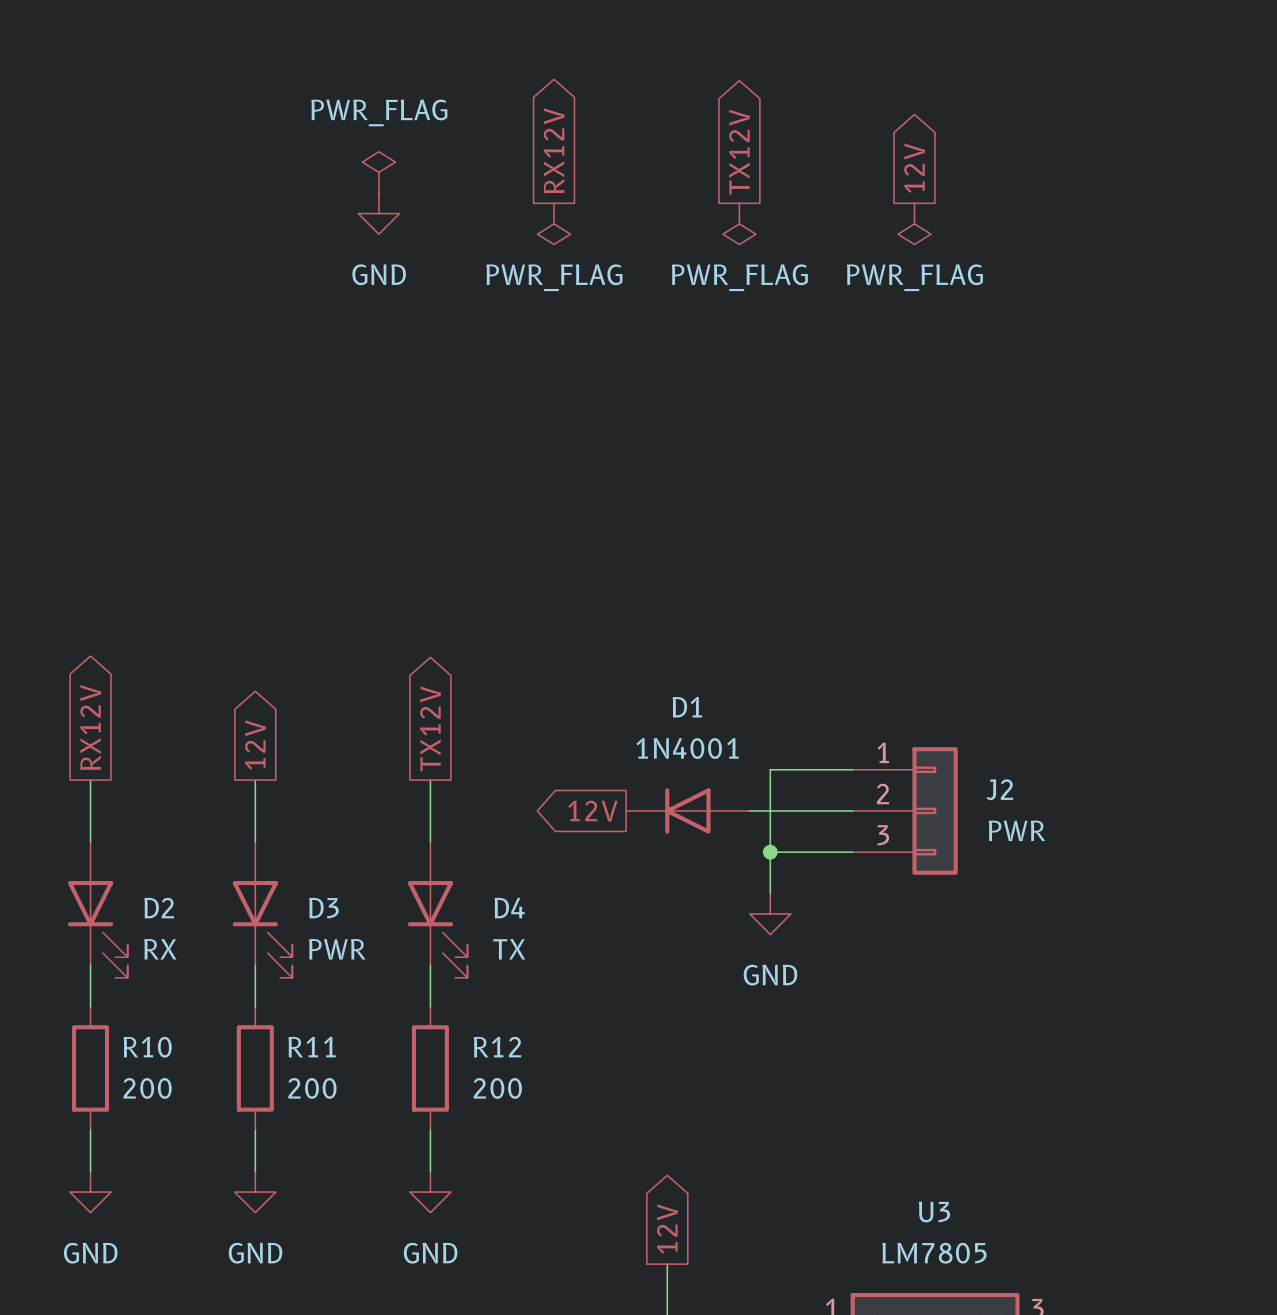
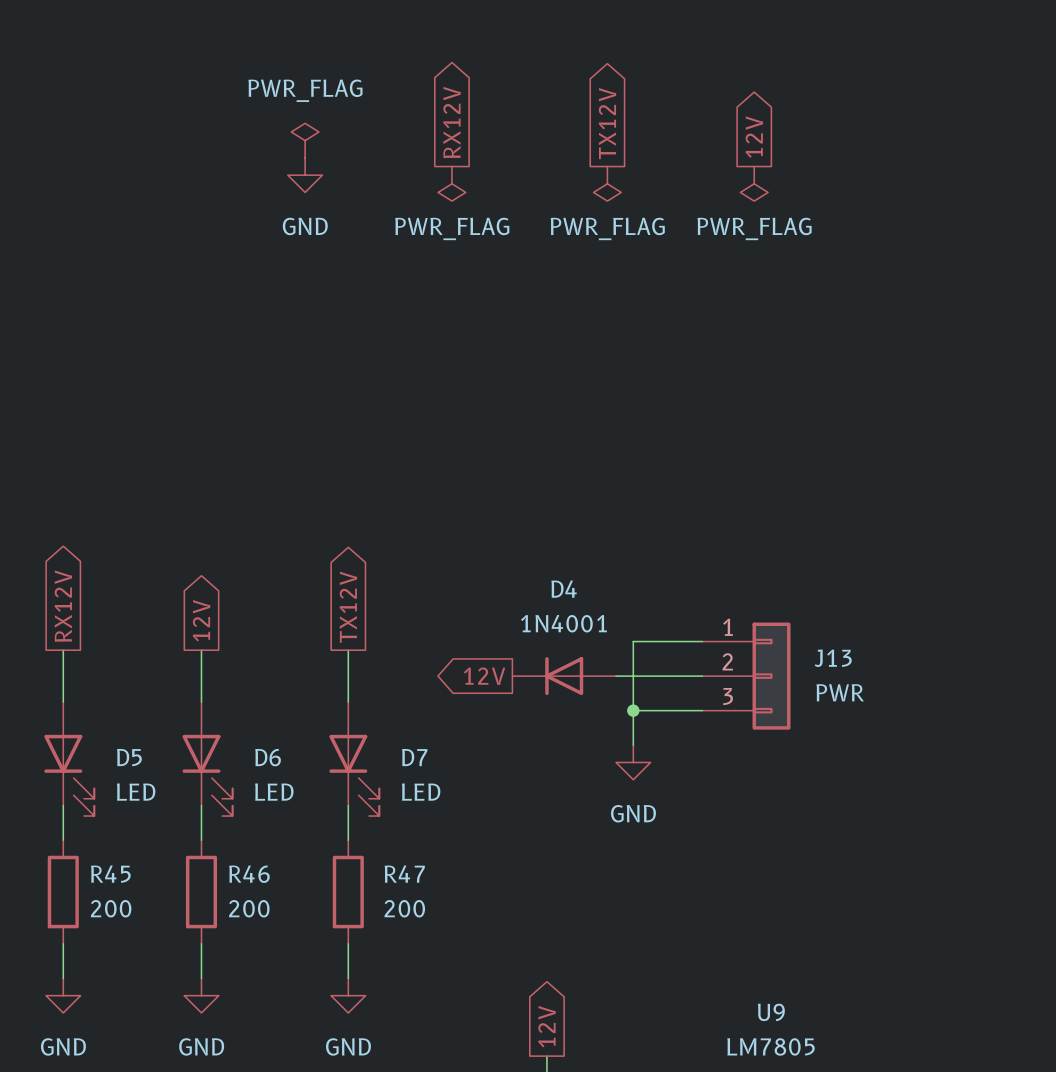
D1 name: D1 (687, 707) -> D4 (564, 589)
J2 name: J2 (999, 789) -> J13 (833, 658)
D2 name: D2 (159, 908) -> D5 (129, 757)
D3 name: D3 (323, 908) -> D6 (268, 757)
D4 name: D4 (509, 908) -> D7 (414, 757)
D2 value: RX (160, 949) -> LED (136, 792)
D3 value: PWR (337, 949) -> LED (274, 792)
D4 value: TX (509, 949) -> LED (421, 792)
R10 name: R10 (147, 1047) -> R45 (110, 874)
R11 name: R11 (312, 1047) -> R46 (249, 874)
R12 name: R12 (497, 1047) -> R47 (404, 874)
U3 name: U3 (934, 1211) -> U9 (771, 1012)

